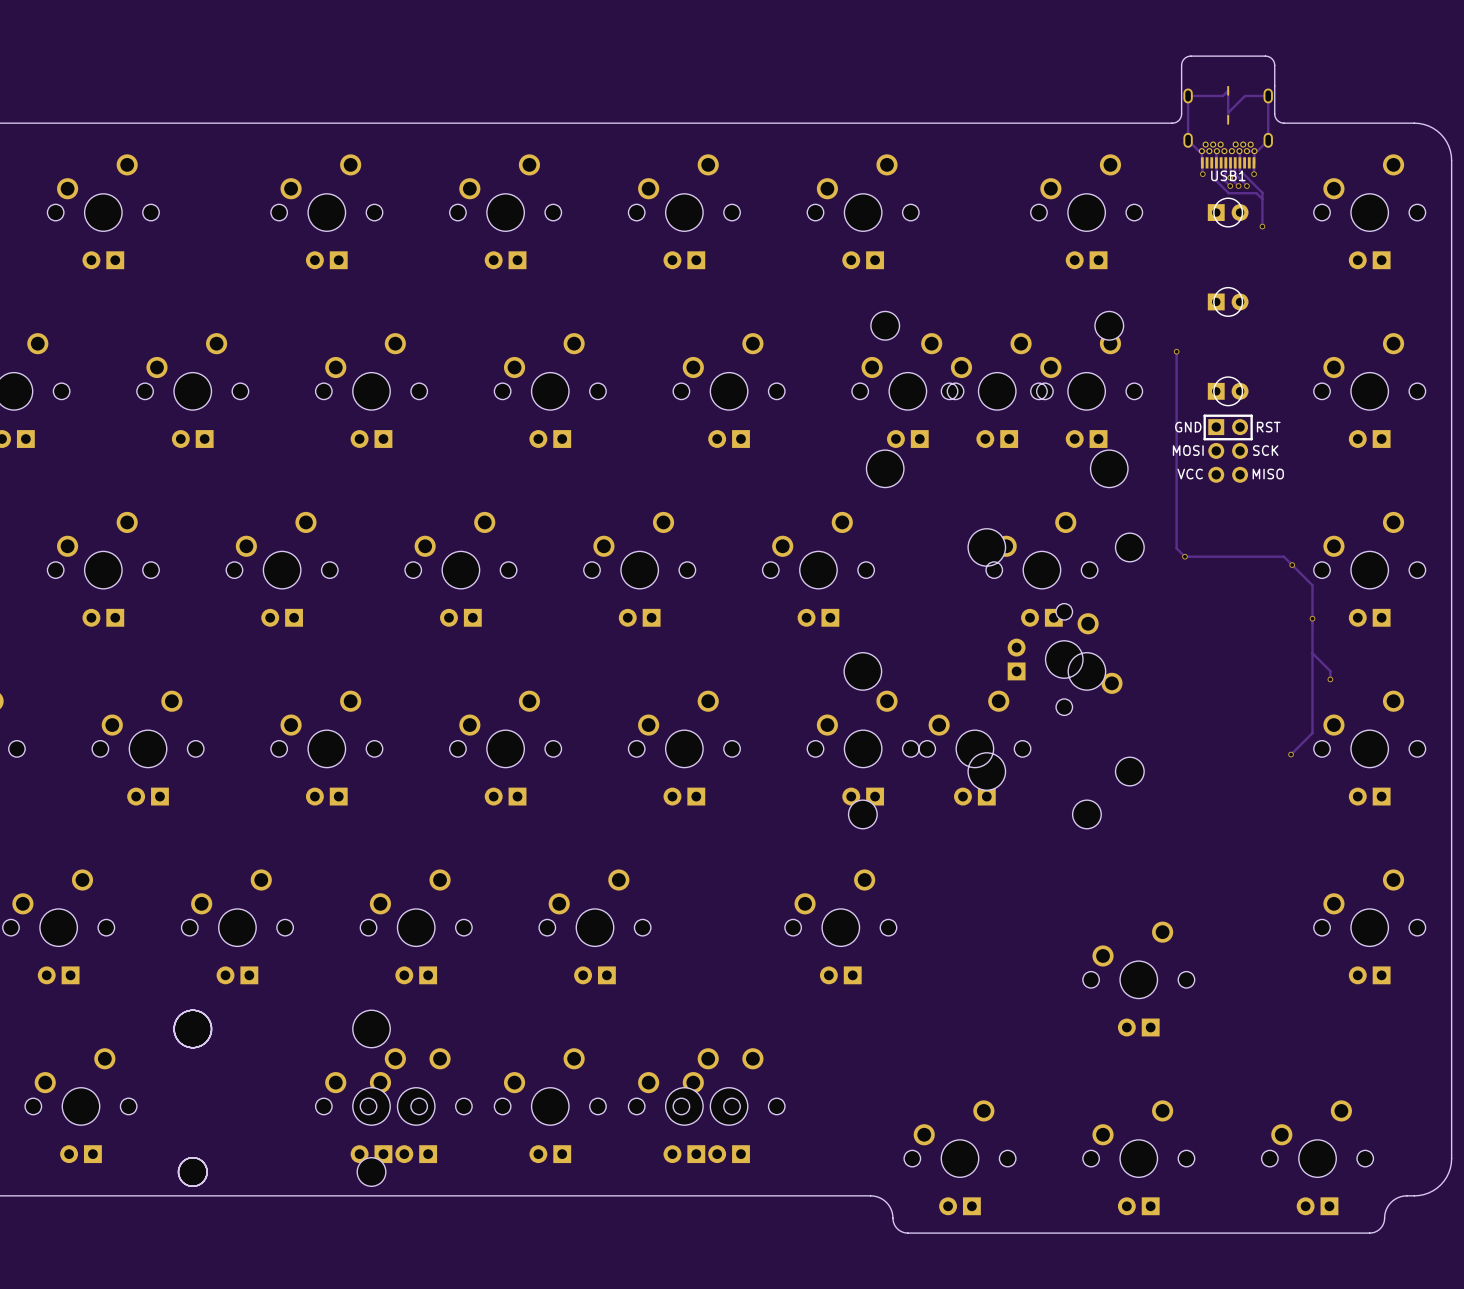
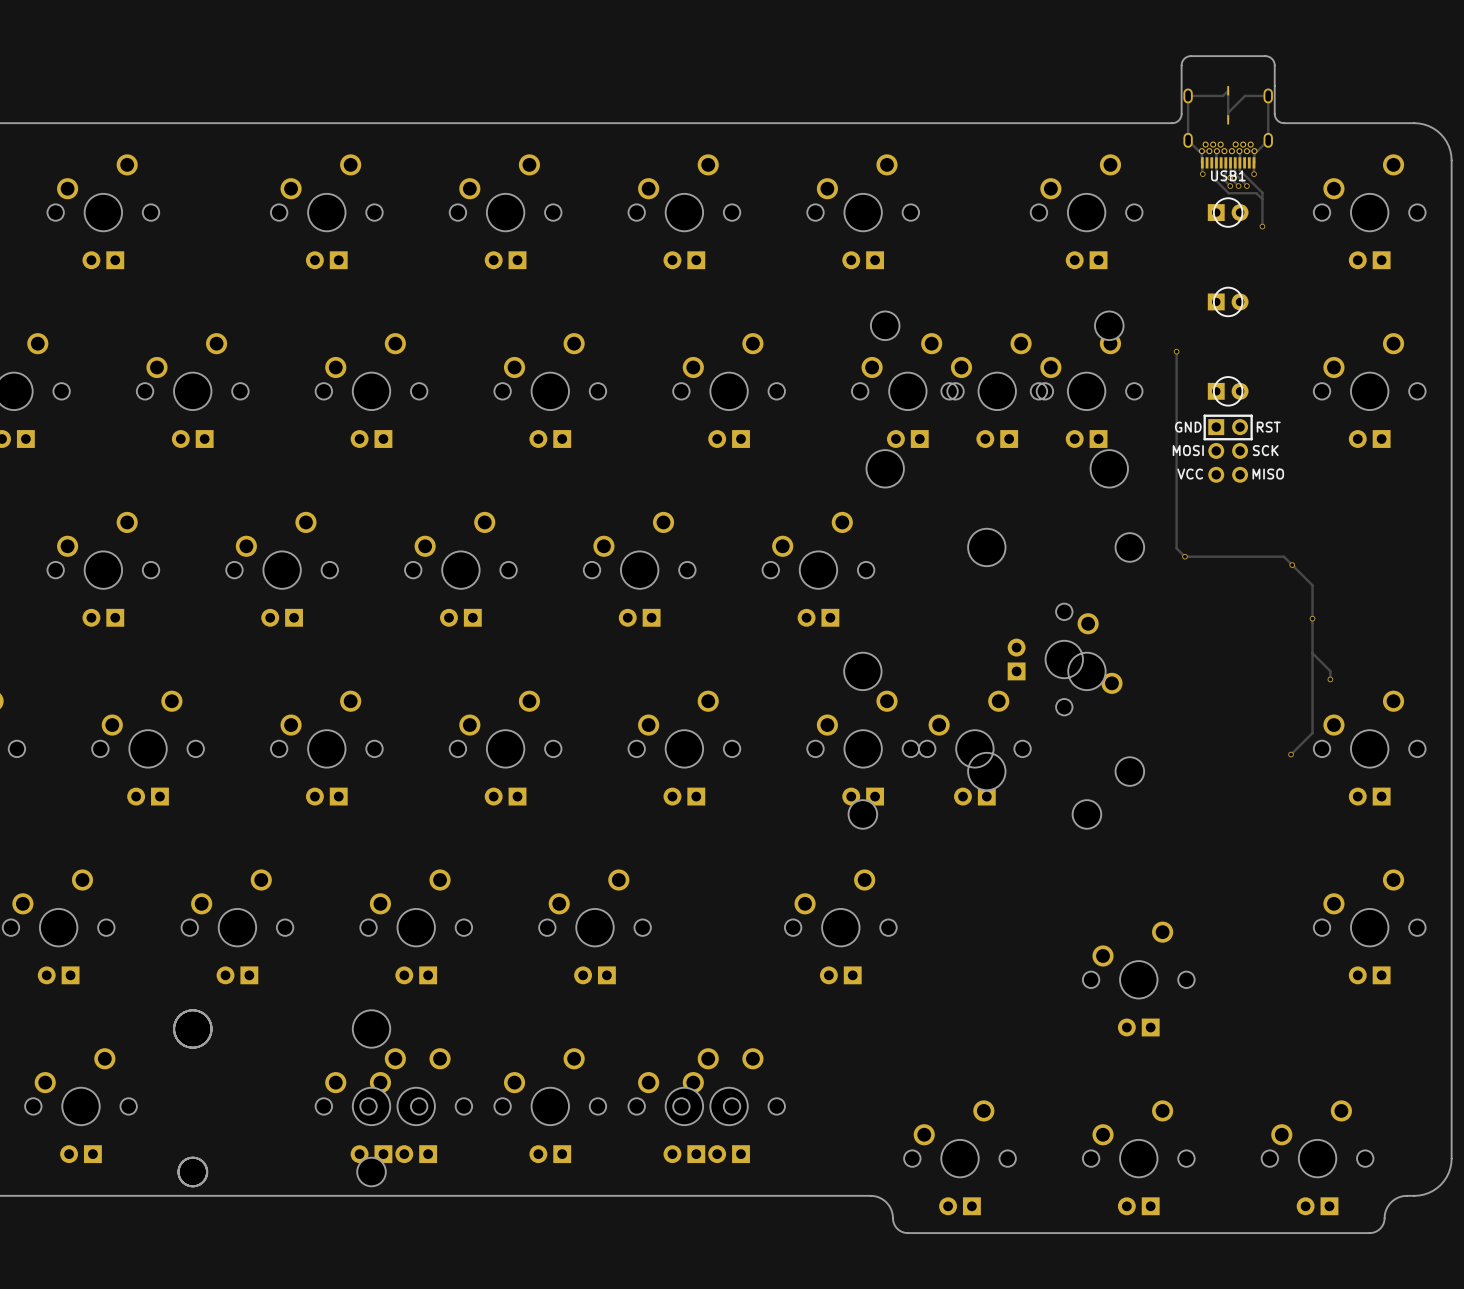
part: (1041, 569) -> none
part: (1369, 569) -> none

